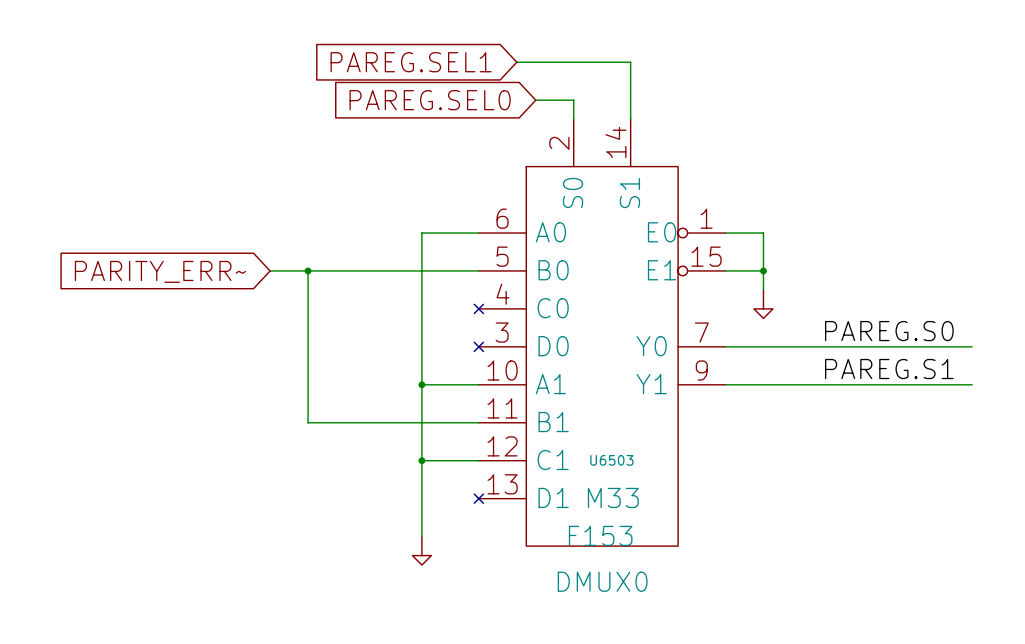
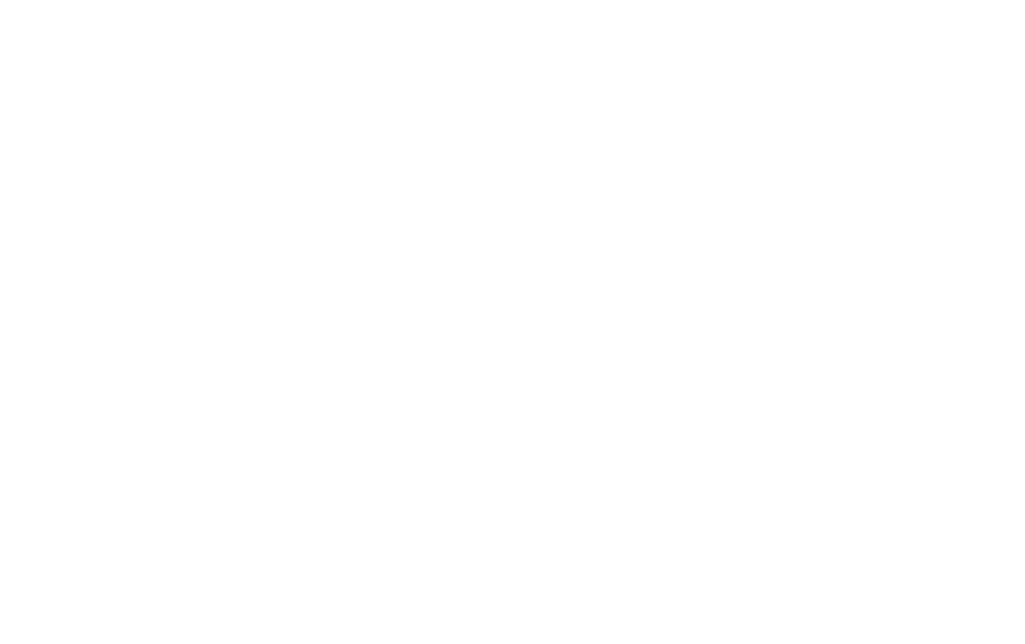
global label: PAREG.SEL1 (411, 62) -> none
wire: (516, 62) (630, 62) (630, 119) -> none
global label: PAREG.SEL0 (430, 100) -> none
wire: (535, 100) (573, 100) (573, 119) -> none
wire: (478, 233) (421, 233) (421, 536) -> none
wire: (725, 233) (763, 233) (763, 289) -> none
wire: (270, 270) (478, 270) -> none
wire: (308, 270) (308, 422) (478, 422) -> none
junction: (308, 270) -> none
wire: (725, 270) (763, 270) -> none
junction: (763, 270) -> none
global label: PARITY_ERR~ (160, 271) -> none
power symbol: (763, 304) -> none
no-connect mark: (478, 308) -> none
label: PAREG.S0 (889, 331) -> none
U6503: F153 (602, 332) -> none
no-connect mark: (478, 346) -> none
wire: (725, 346) (972, 346) -> none
label: PAREG.S1 (889, 369) -> none
wire: (421, 384) (478, 384) -> none
junction: (421, 384) -> none
wire: (725, 384) (972, 384) -> none
wire: (421, 460) (478, 460) -> none
junction: (421, 460) -> none
no-connect mark: (478, 498) -> none
power symbol: (421, 551) -> none

